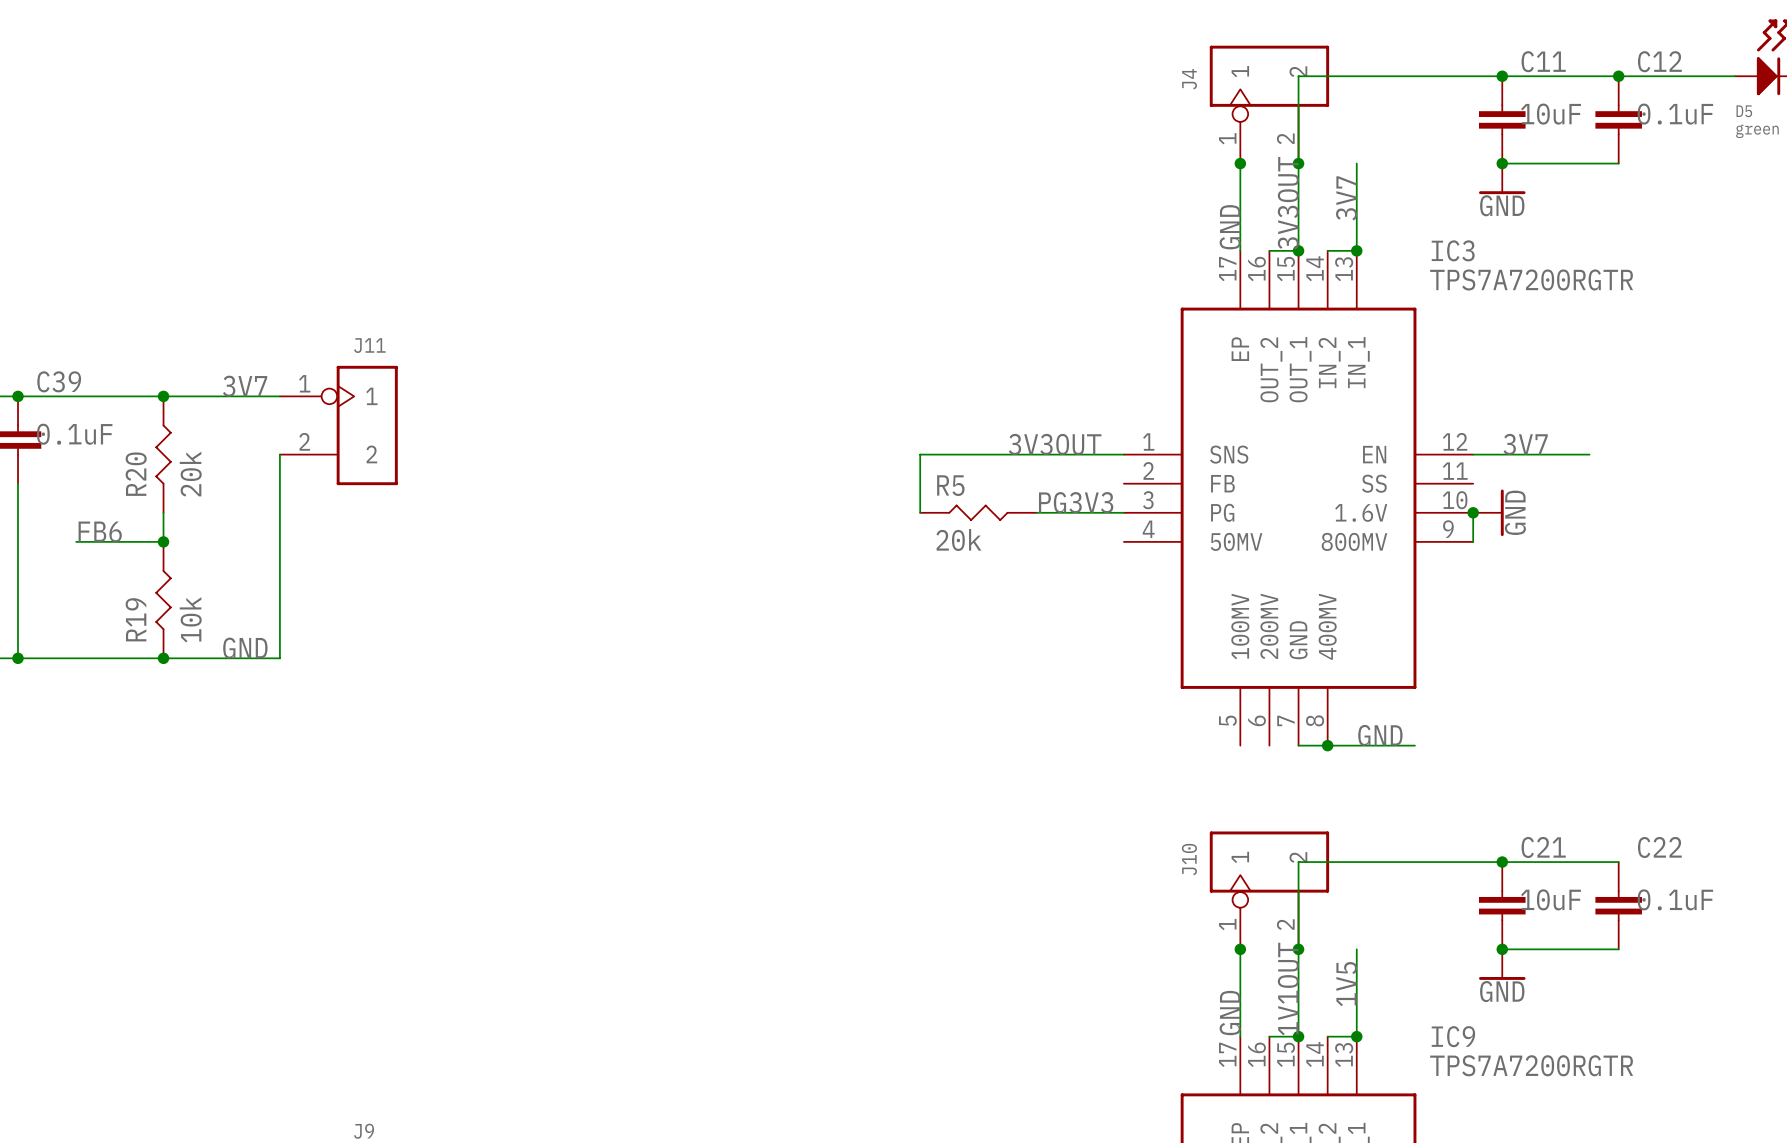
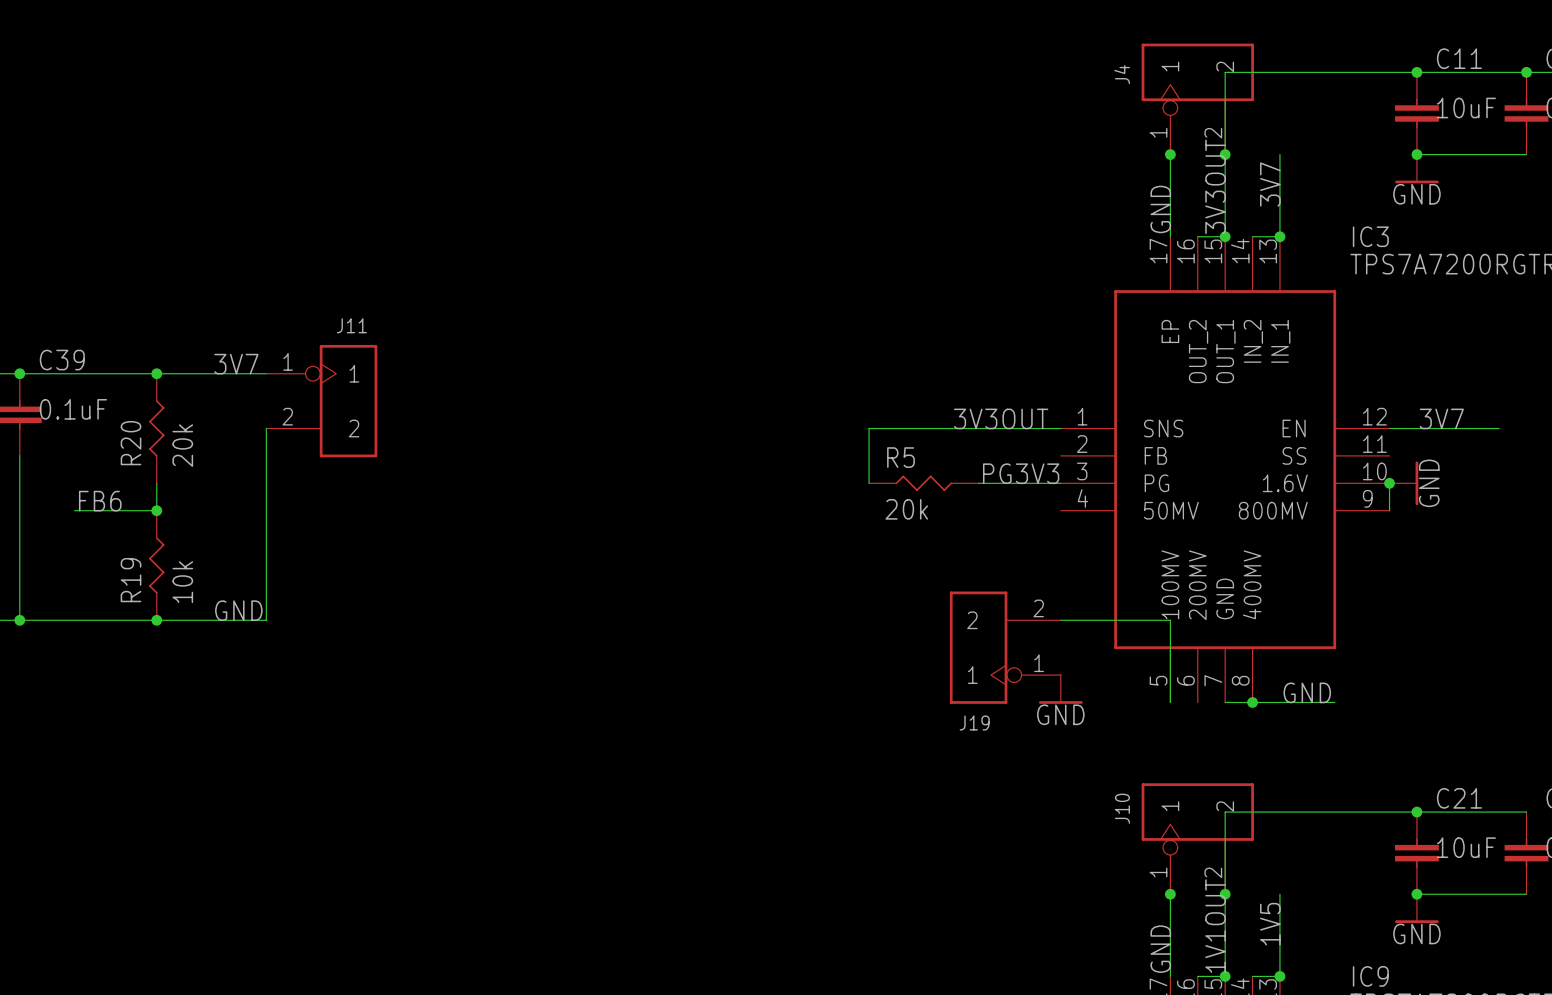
wire: none -> (1060, 620) (1170, 620) (1170, 702)
J19: none -> (1005, 647)
power symbol: none -> GND (1060, 689)

